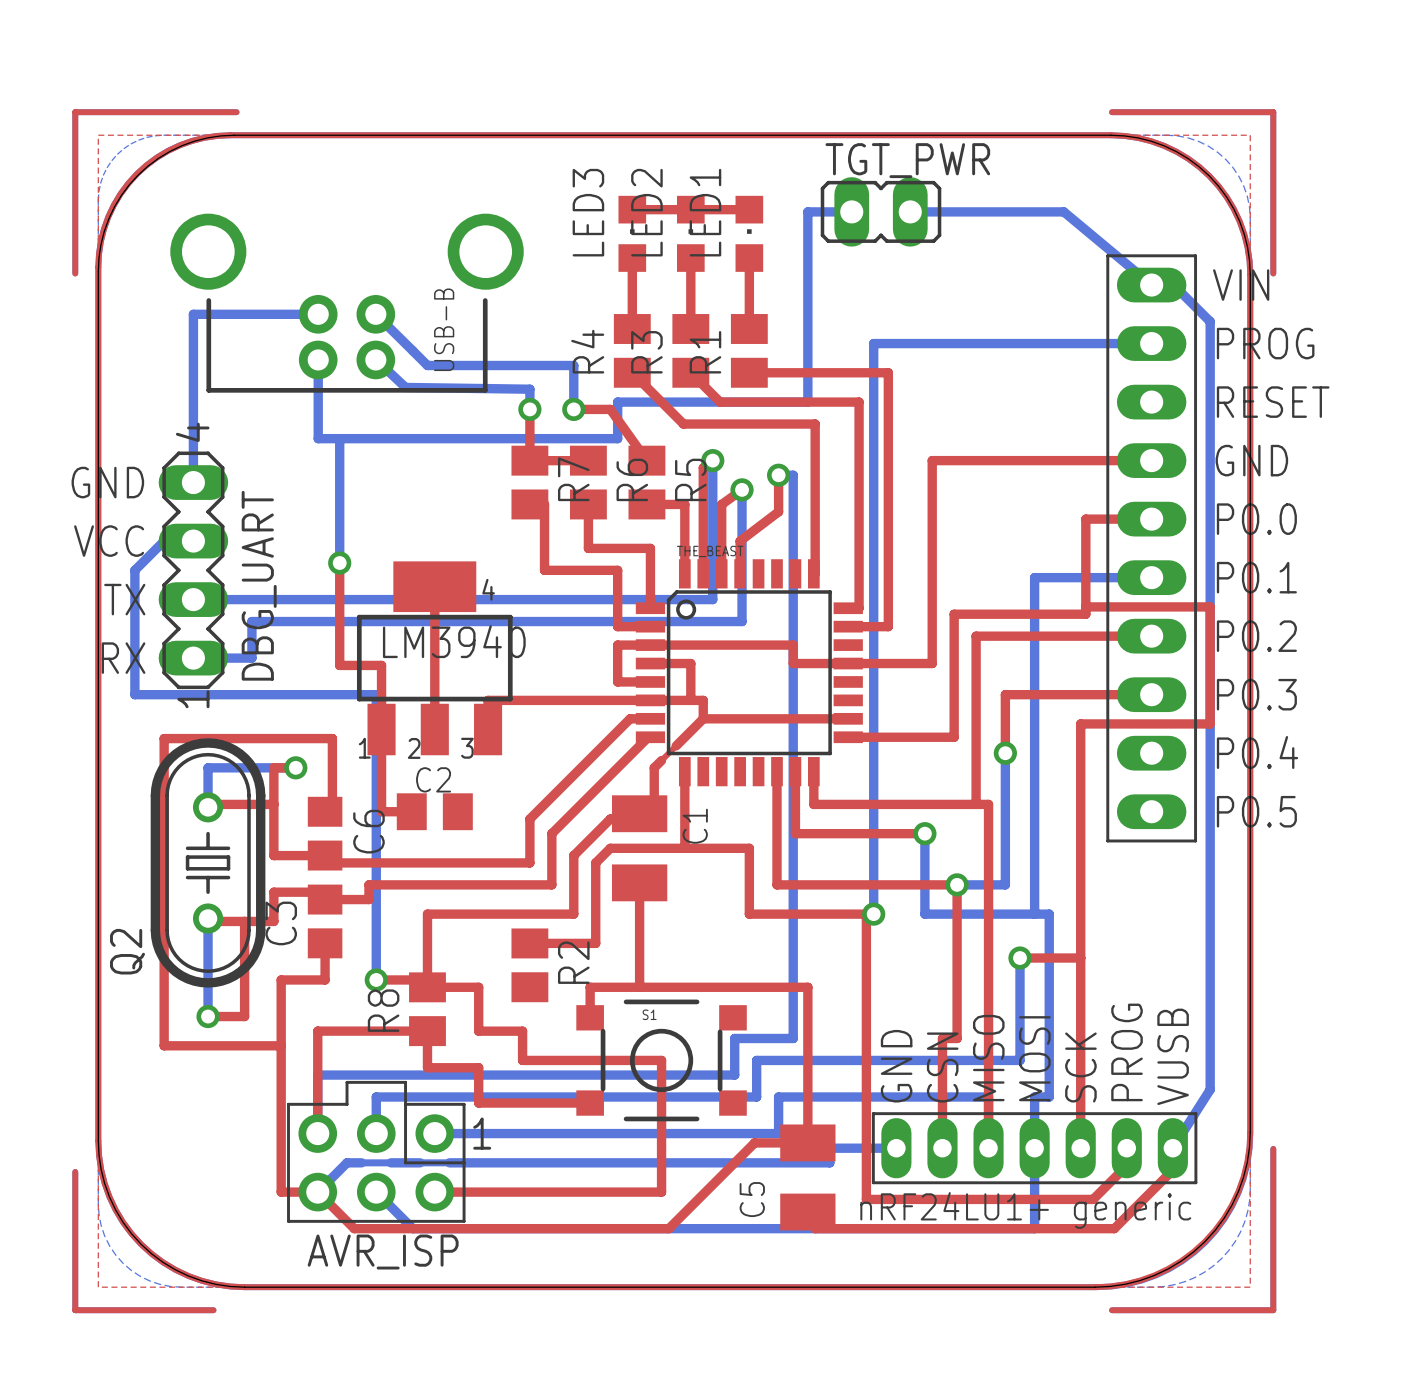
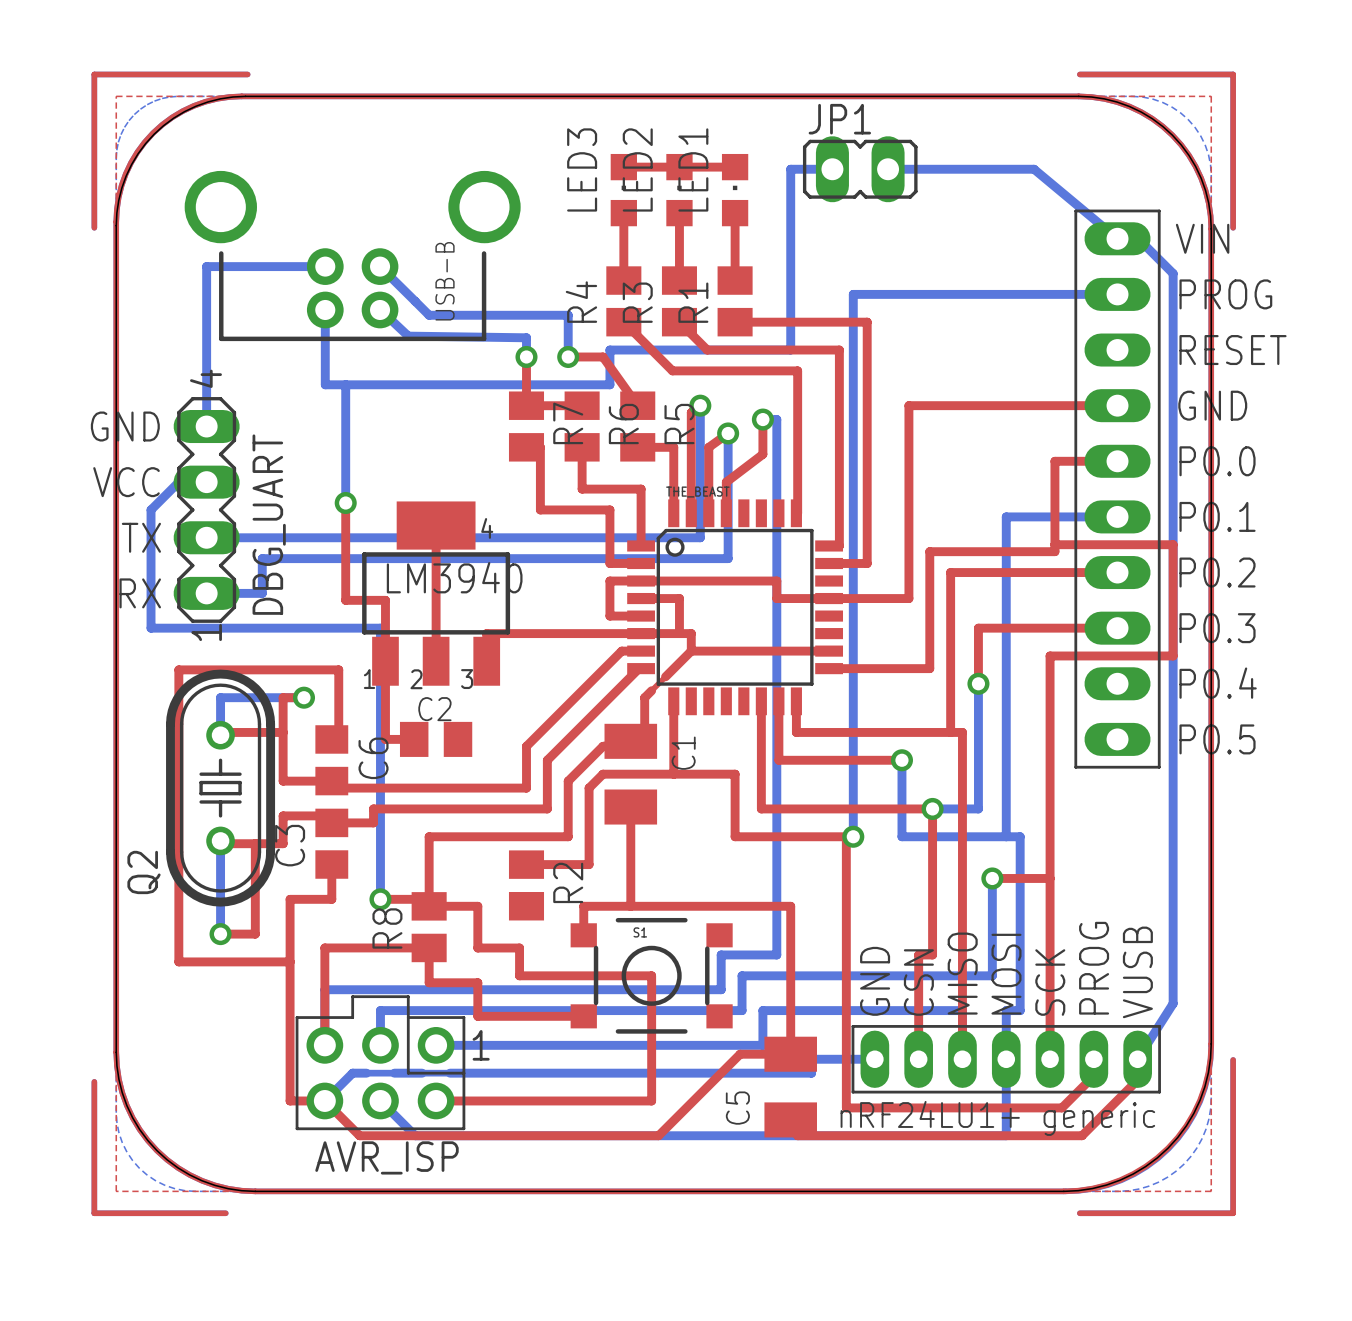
TGT_PWR name: TGT_PWR (907, 160) -> JP1 (839, 119)

